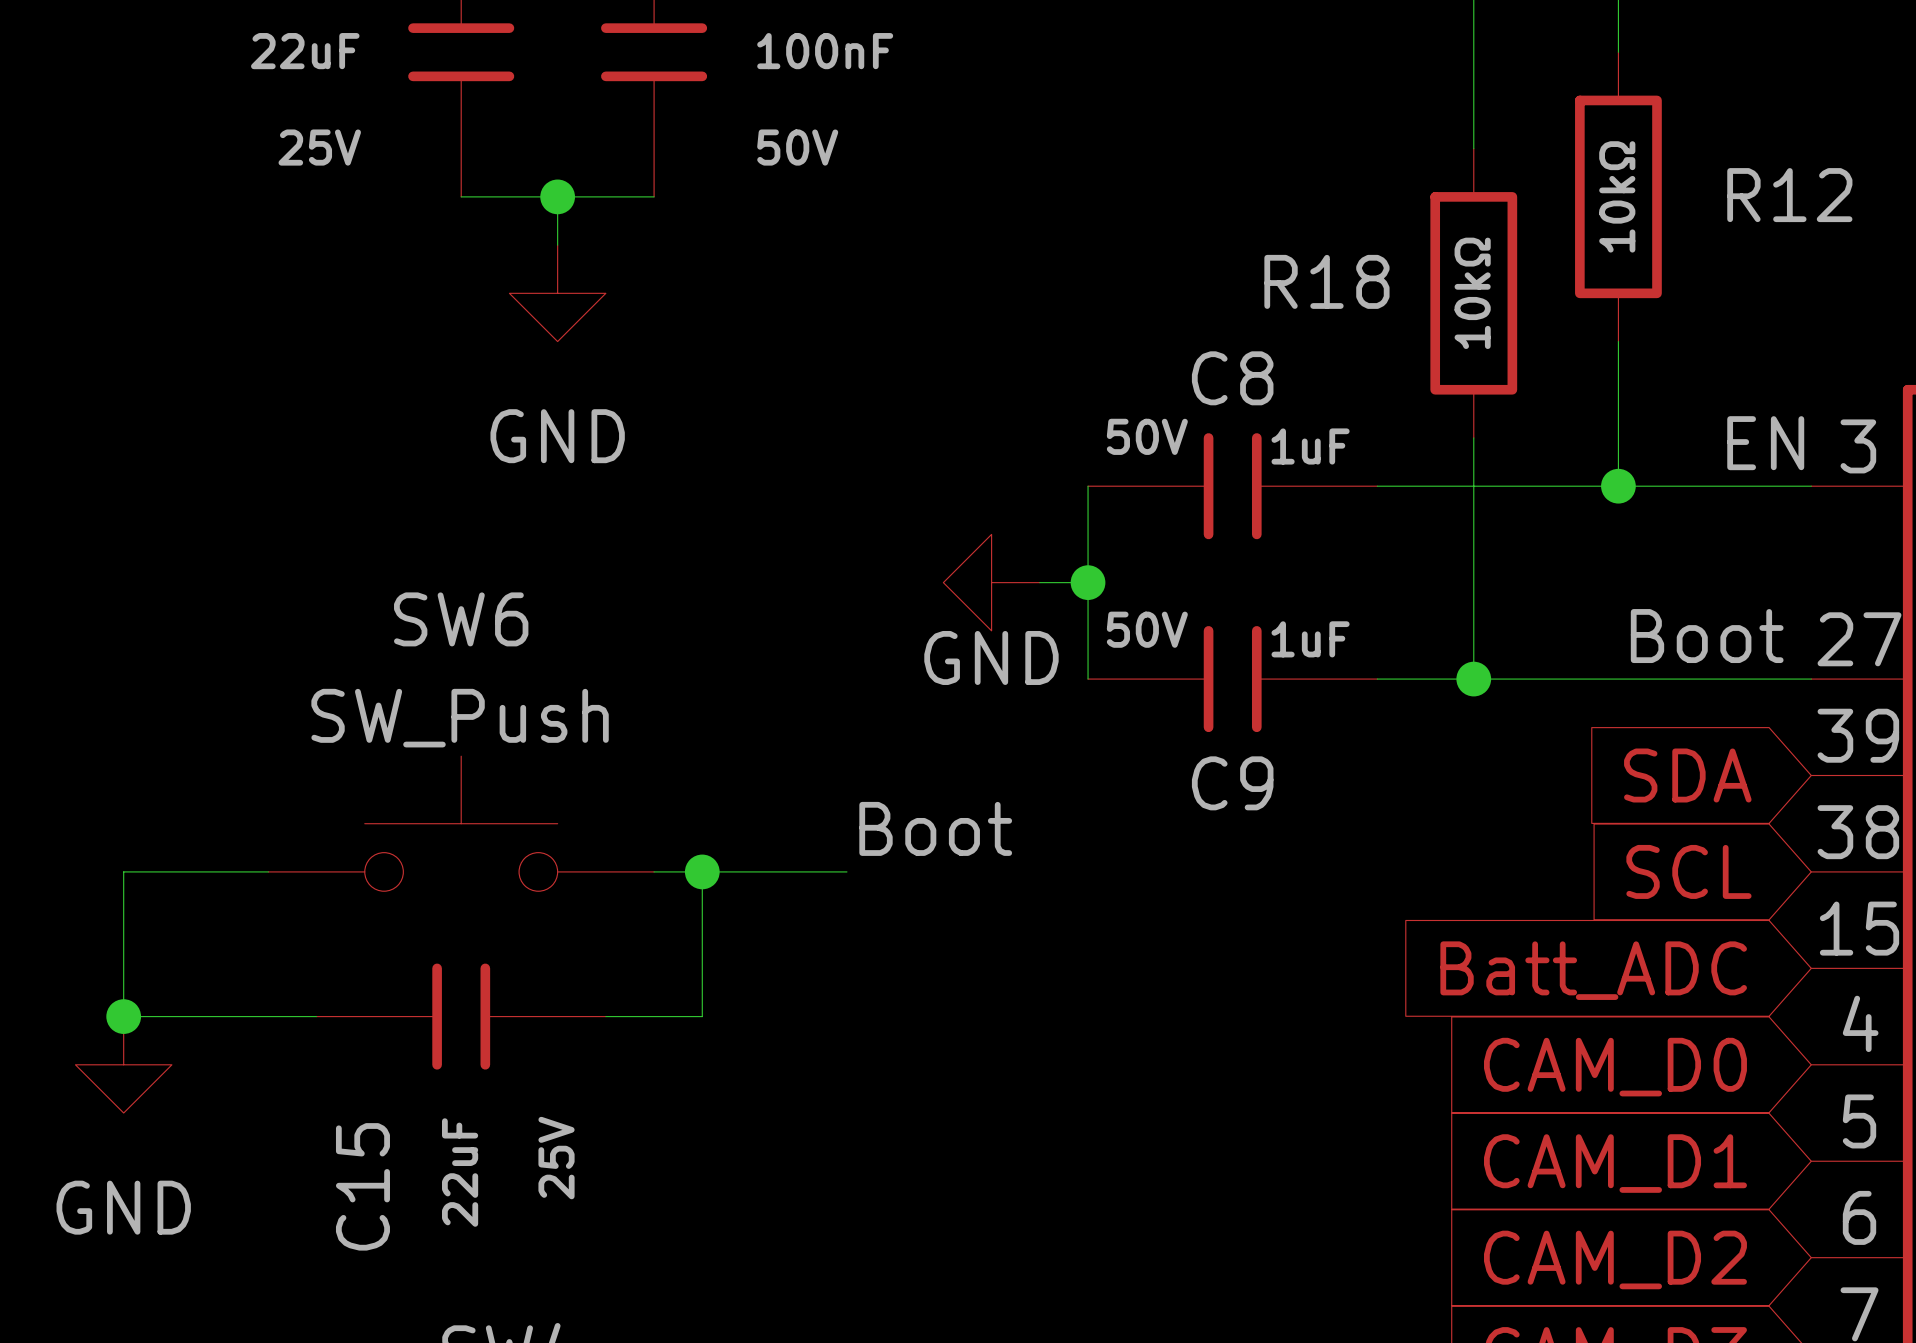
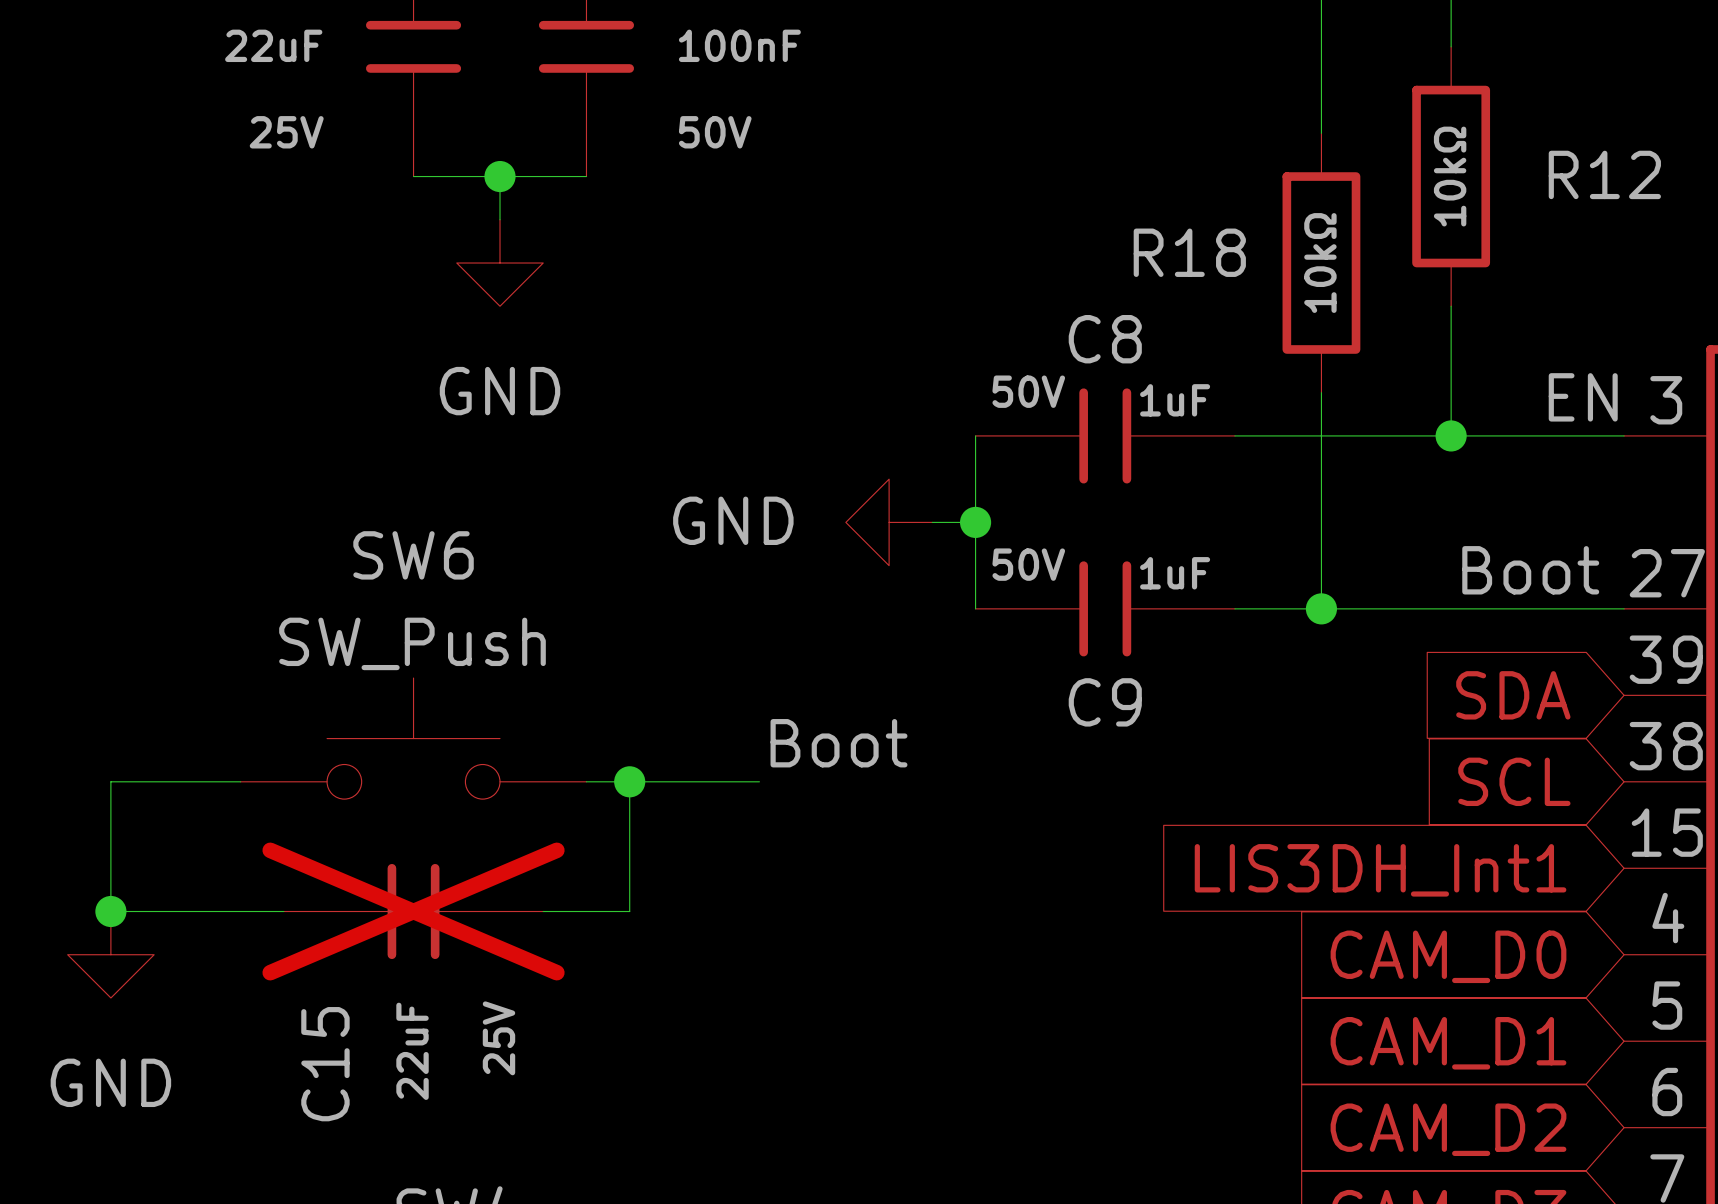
power symbol text position: GND (991, 657) -> GND (733, 520)
global label: Batt_ADC (1593, 970) -> LIS3DH_Int1 (1380, 870)
C15 do-not-place cross: none -> (413, 911)

